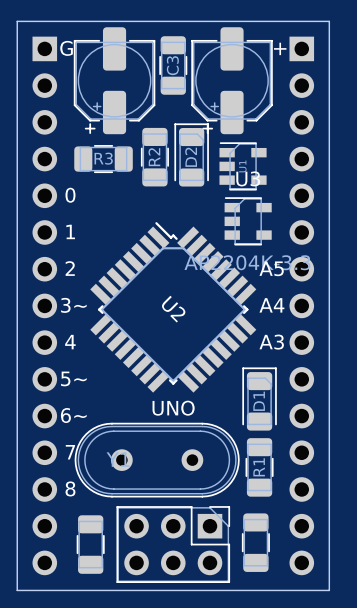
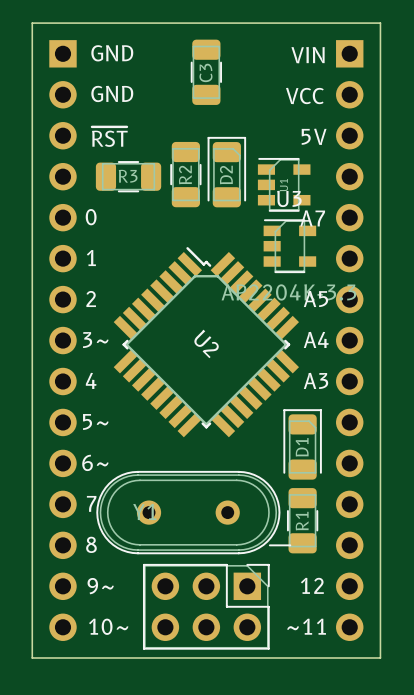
text: G (66, 48) -> none
text: none -> GND (112, 53)
text: + (280, 48) -> none
text: none -> VIN (308, 55)
part: (114, 80) -> none
part: (232, 80) -> none
text: none -> GND (112, 93)
text: none -> VCC (304, 96)
text: none -> ~{RST} (109, 136)
text: none -> 5V (314, 136)
text: none -> A7 (312, 218)
text: UNO (173, 408) -> none
line: none -> (269, 545) (290, 545)
text: none -> 9~ (100, 586)
text: none -> 12 (312, 585)
part: (255, 542) -> none
part: (90, 544) -> none
text: none -> 10~ (108, 626)
text: none -> ~11 (306, 626)

